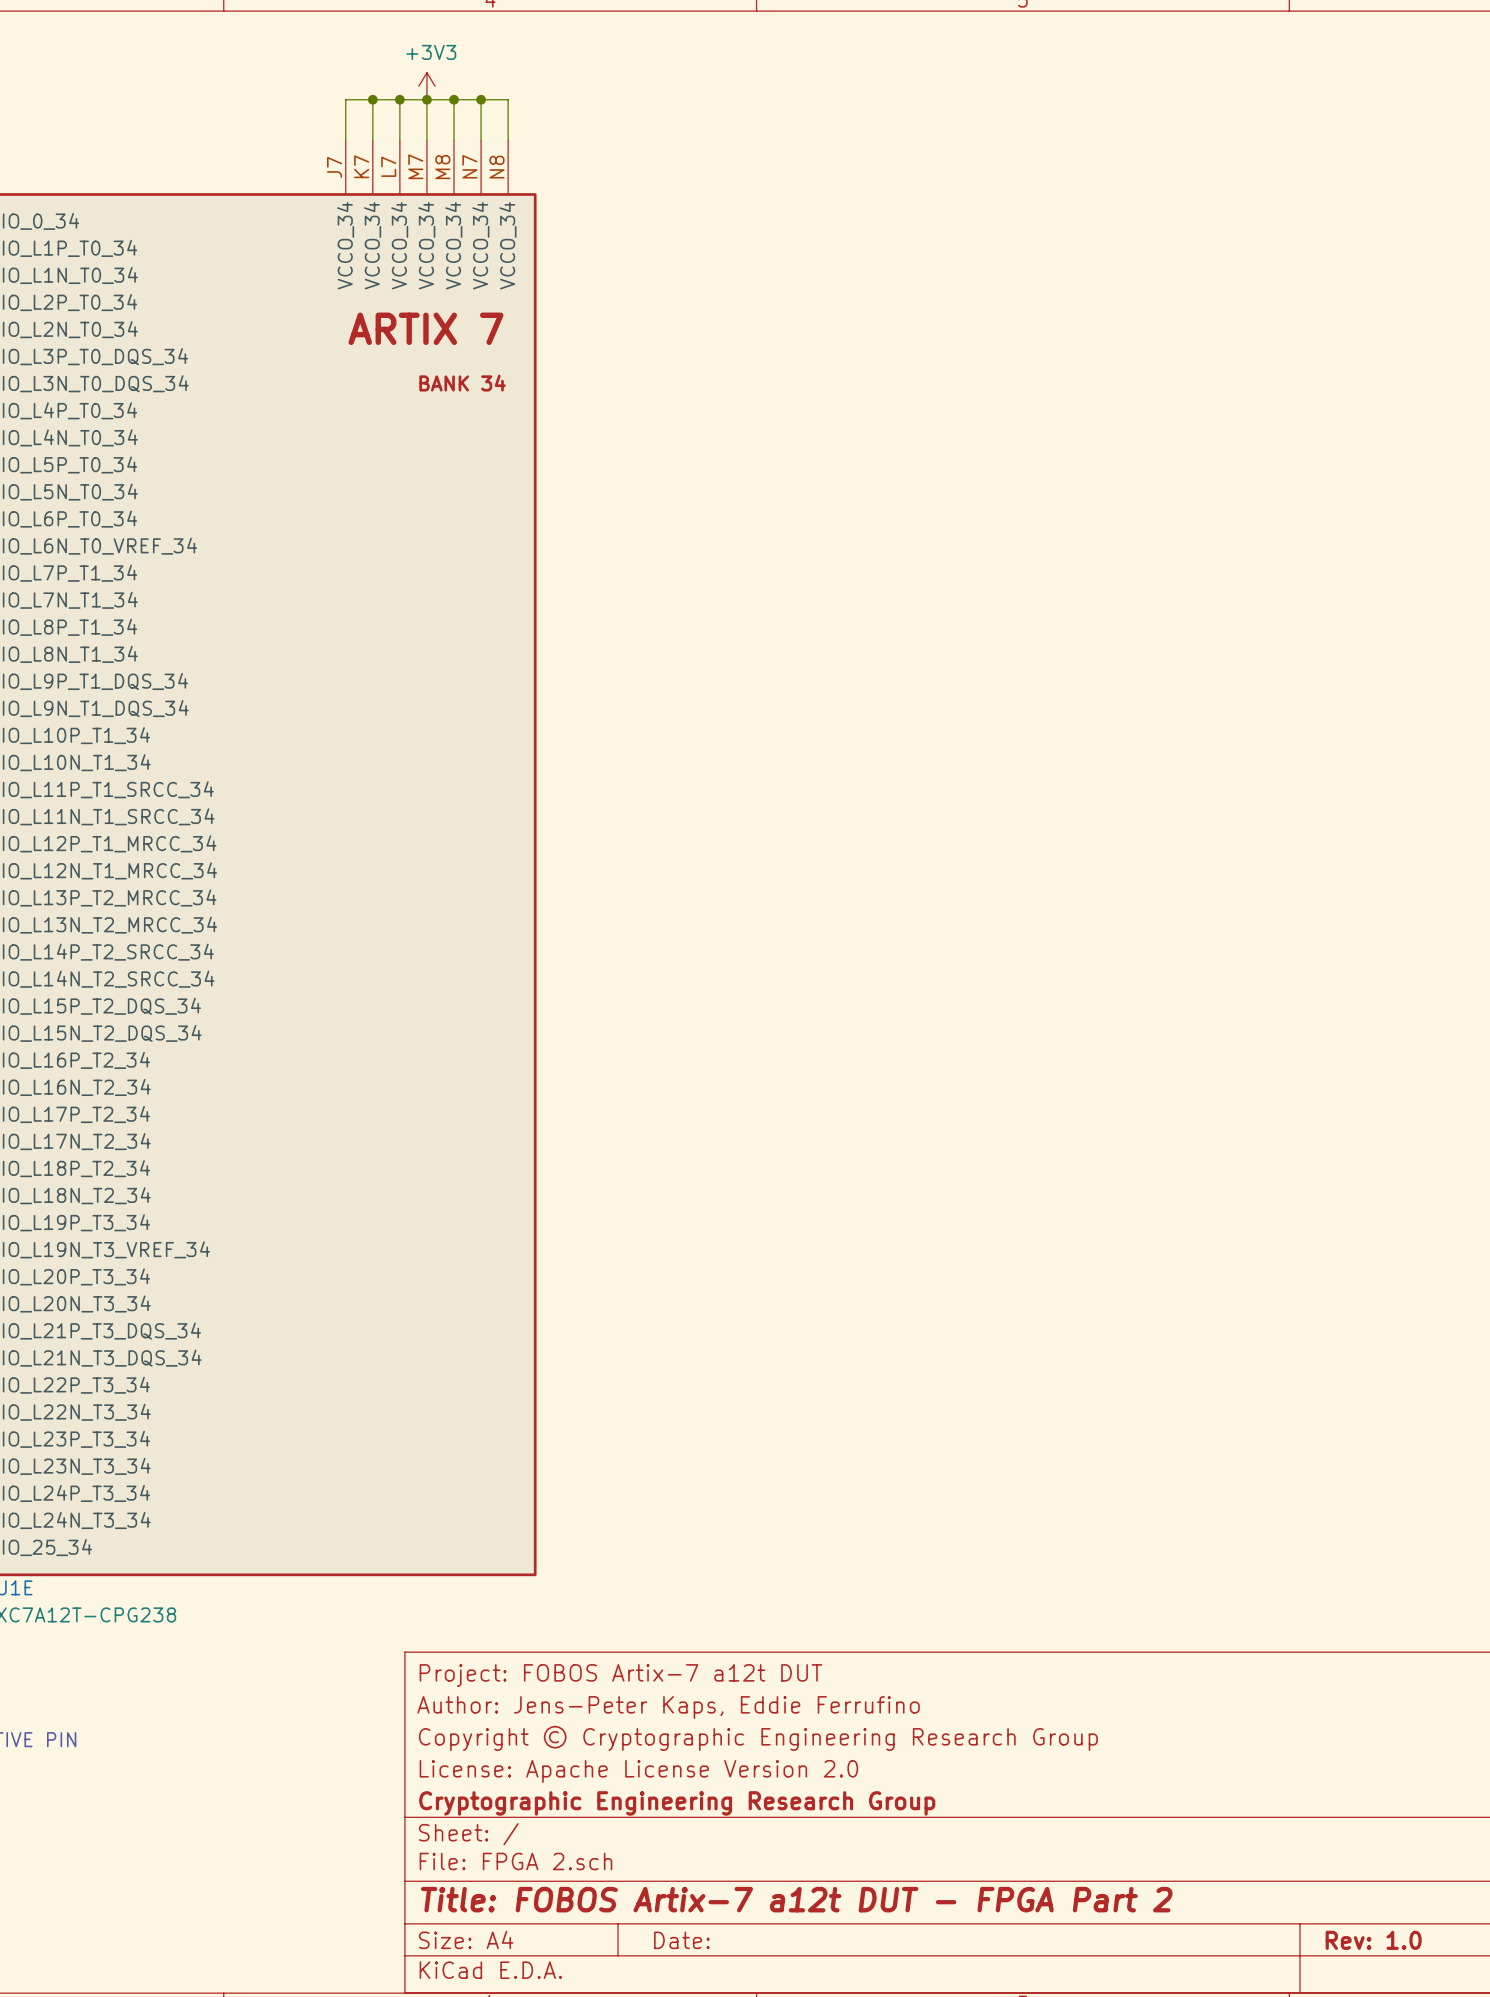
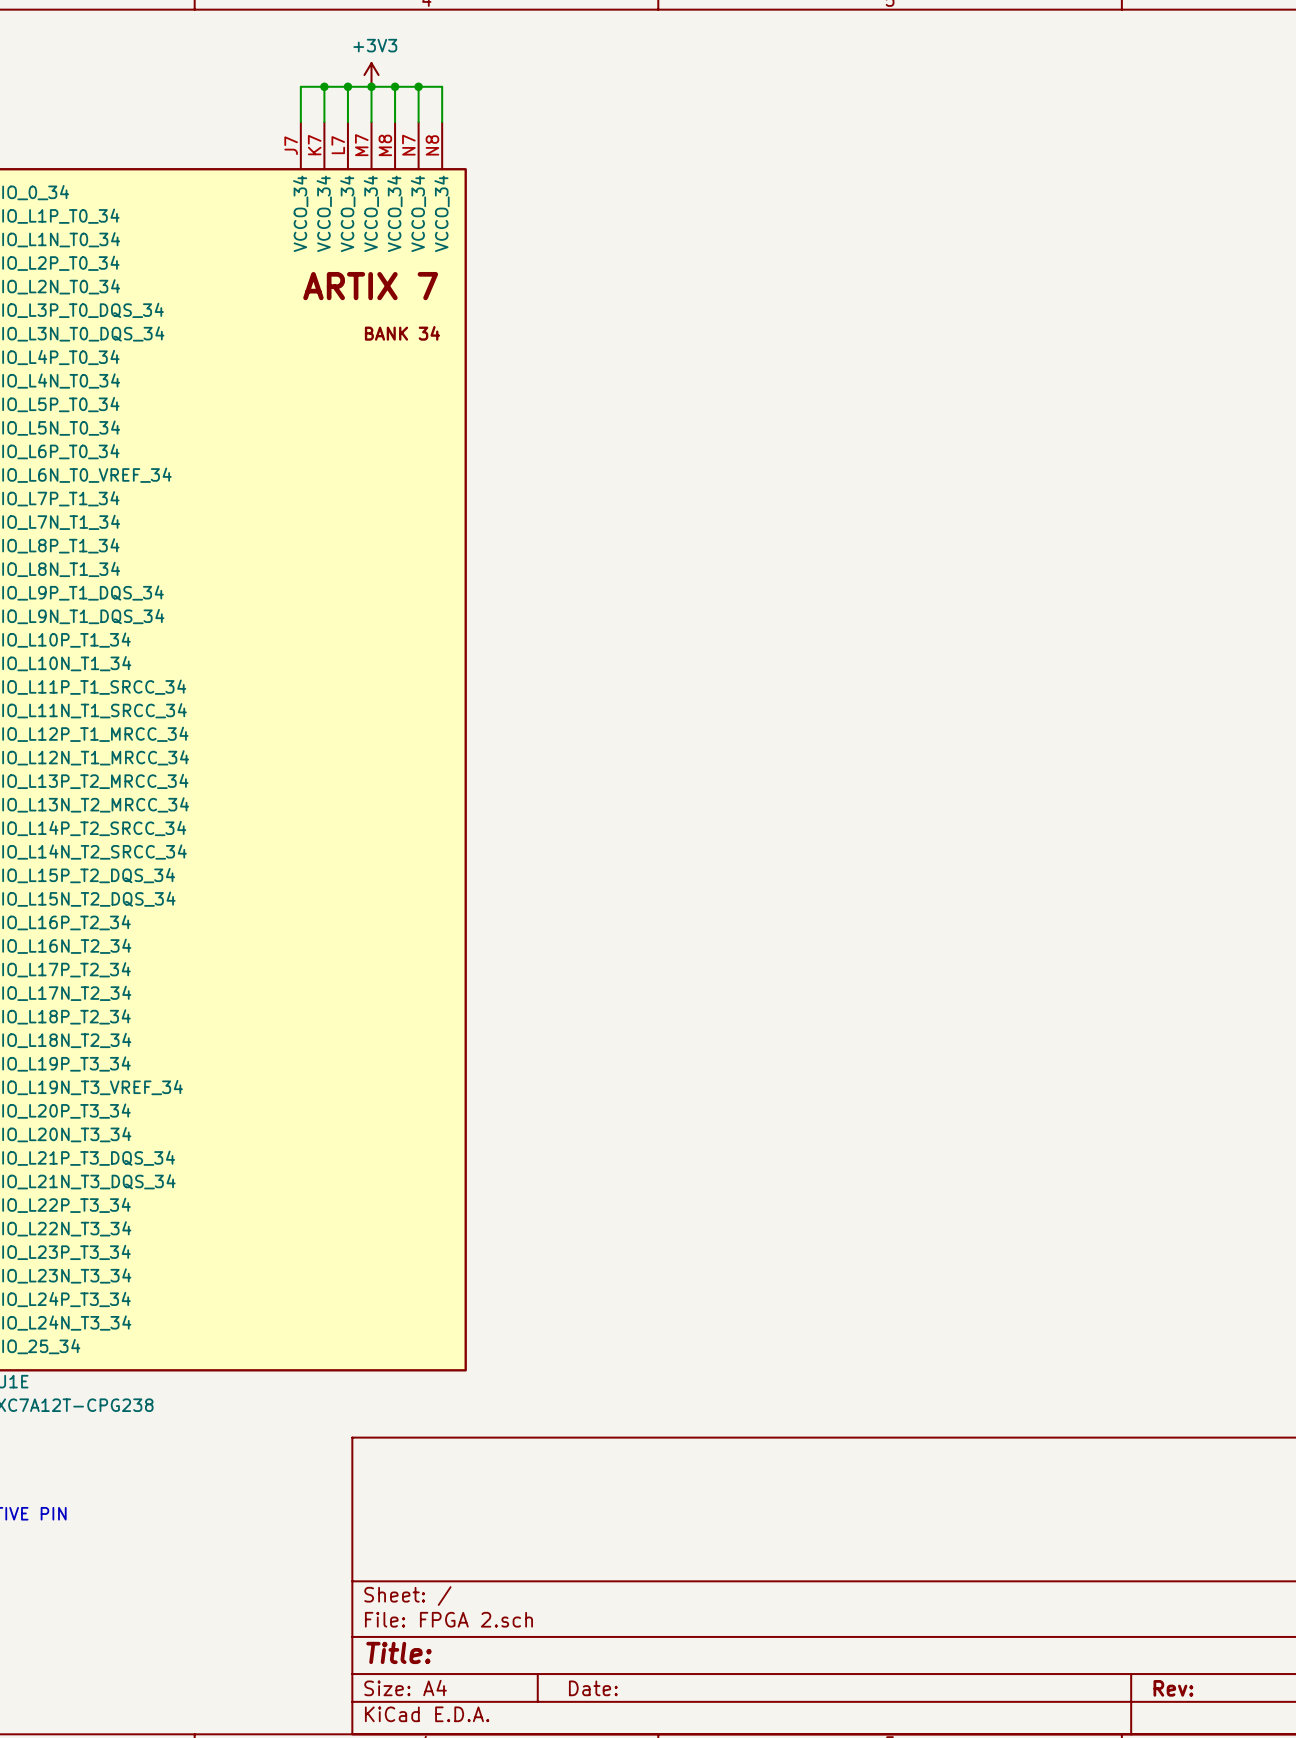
title block: Project: FOBOS Artix-7 a12t DUT (621, 1675) -> none
title block: Author: Jens-Peter Kaps, Eddie Ferrufino (668, 1707) -> none
title block: Copyright © Cryptographic Engineering Research Group (758, 1738) -> none
title block: License: Apache License Version 2.0 (638, 1771) -> none
title block: Cryptographic Engineering Research Group (677, 1803) -> none
title block: Title: FOBOS Artix-7 a12t DUT - FPGA Part 2 (796, 1899) -> Title: (398, 1652)
title block: Rev: 1.0 (1373, 1940) -> Rev: (1173, 1688)

